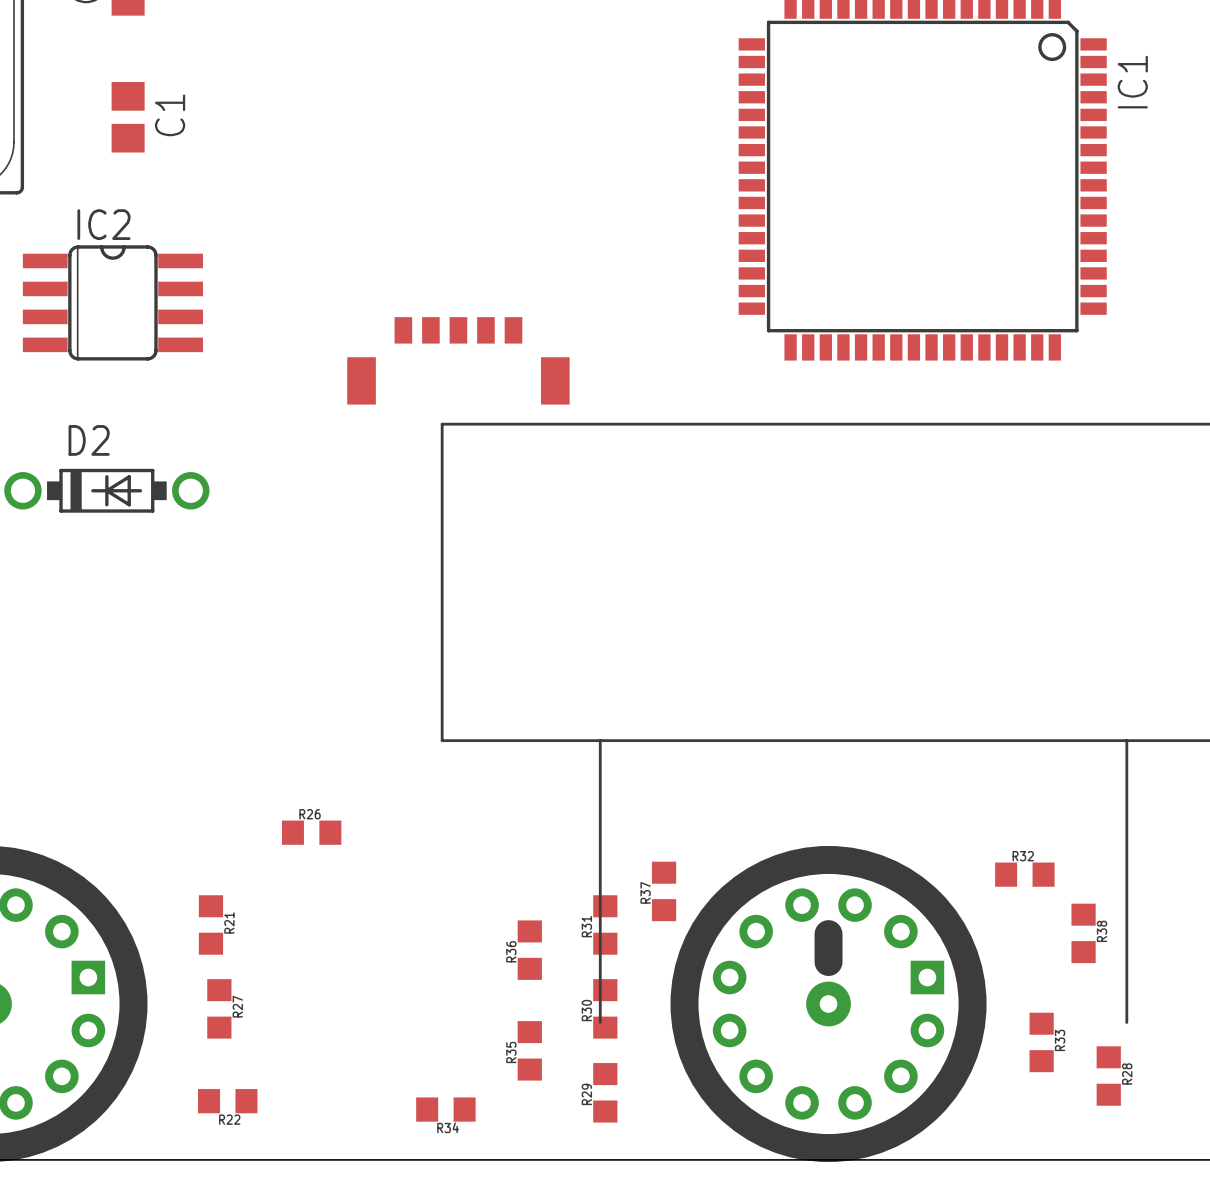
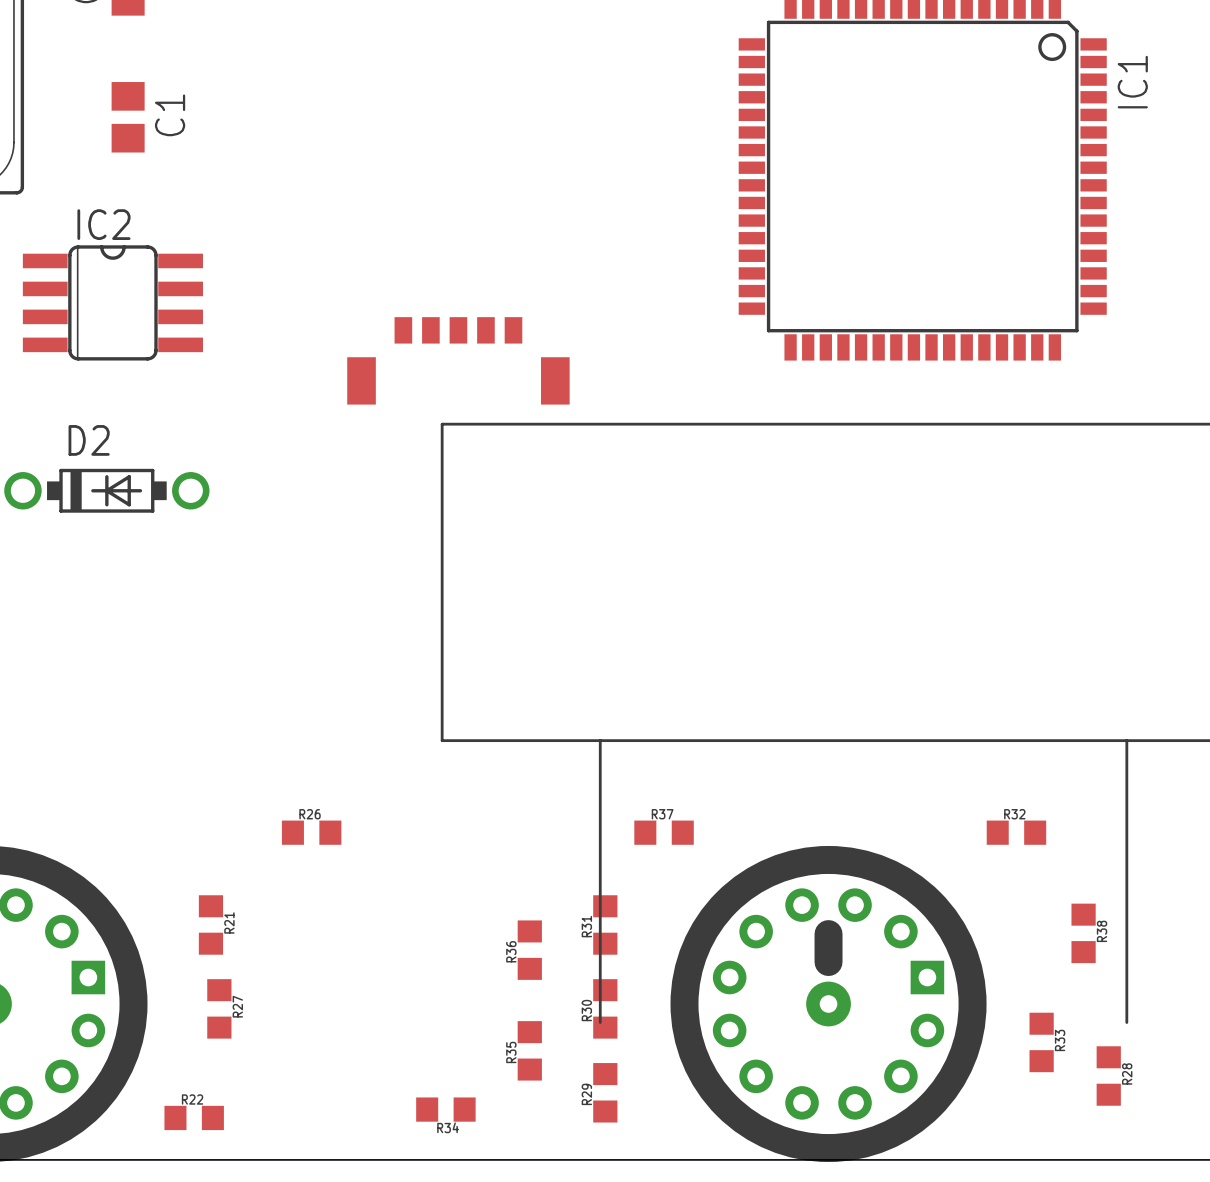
R32 position: (1024, 874) -> (1016, 832)
R37 rotation: 0° (664, 891) -> 90° clockwise (664, 832)
R37 position: (664, 891) -> (664, 832)
R22 position: (227, 1101) -> (194, 1117)
R22 name position: R22 (229, 1119) -> R22 (192, 1099)

